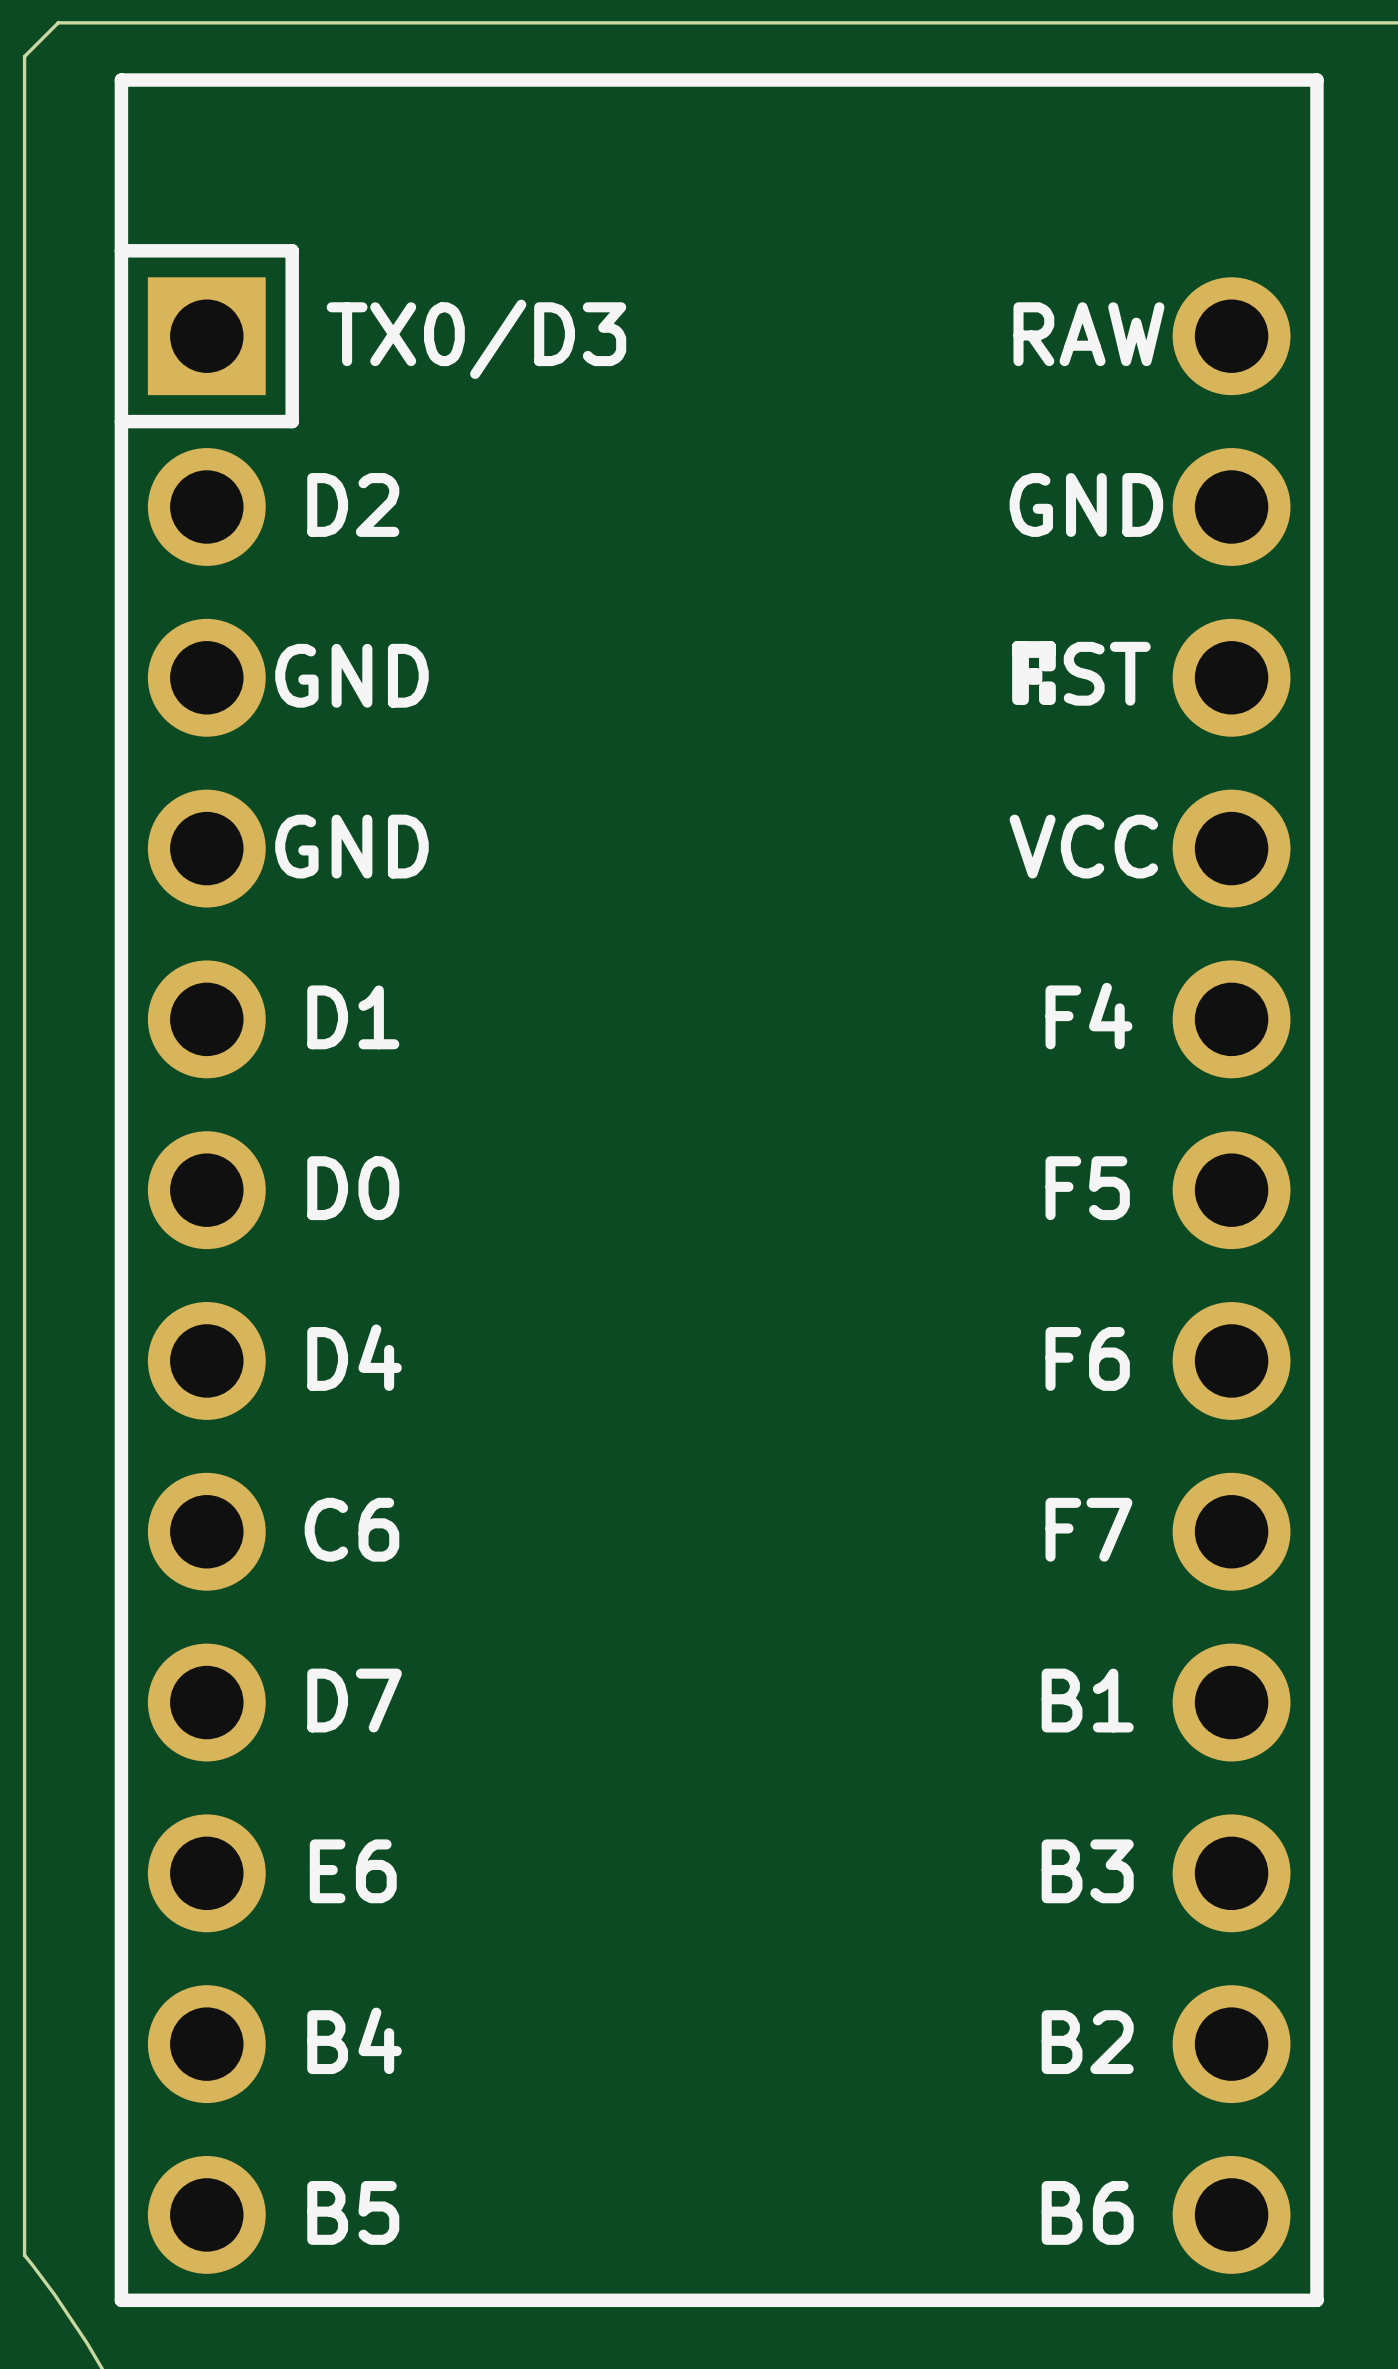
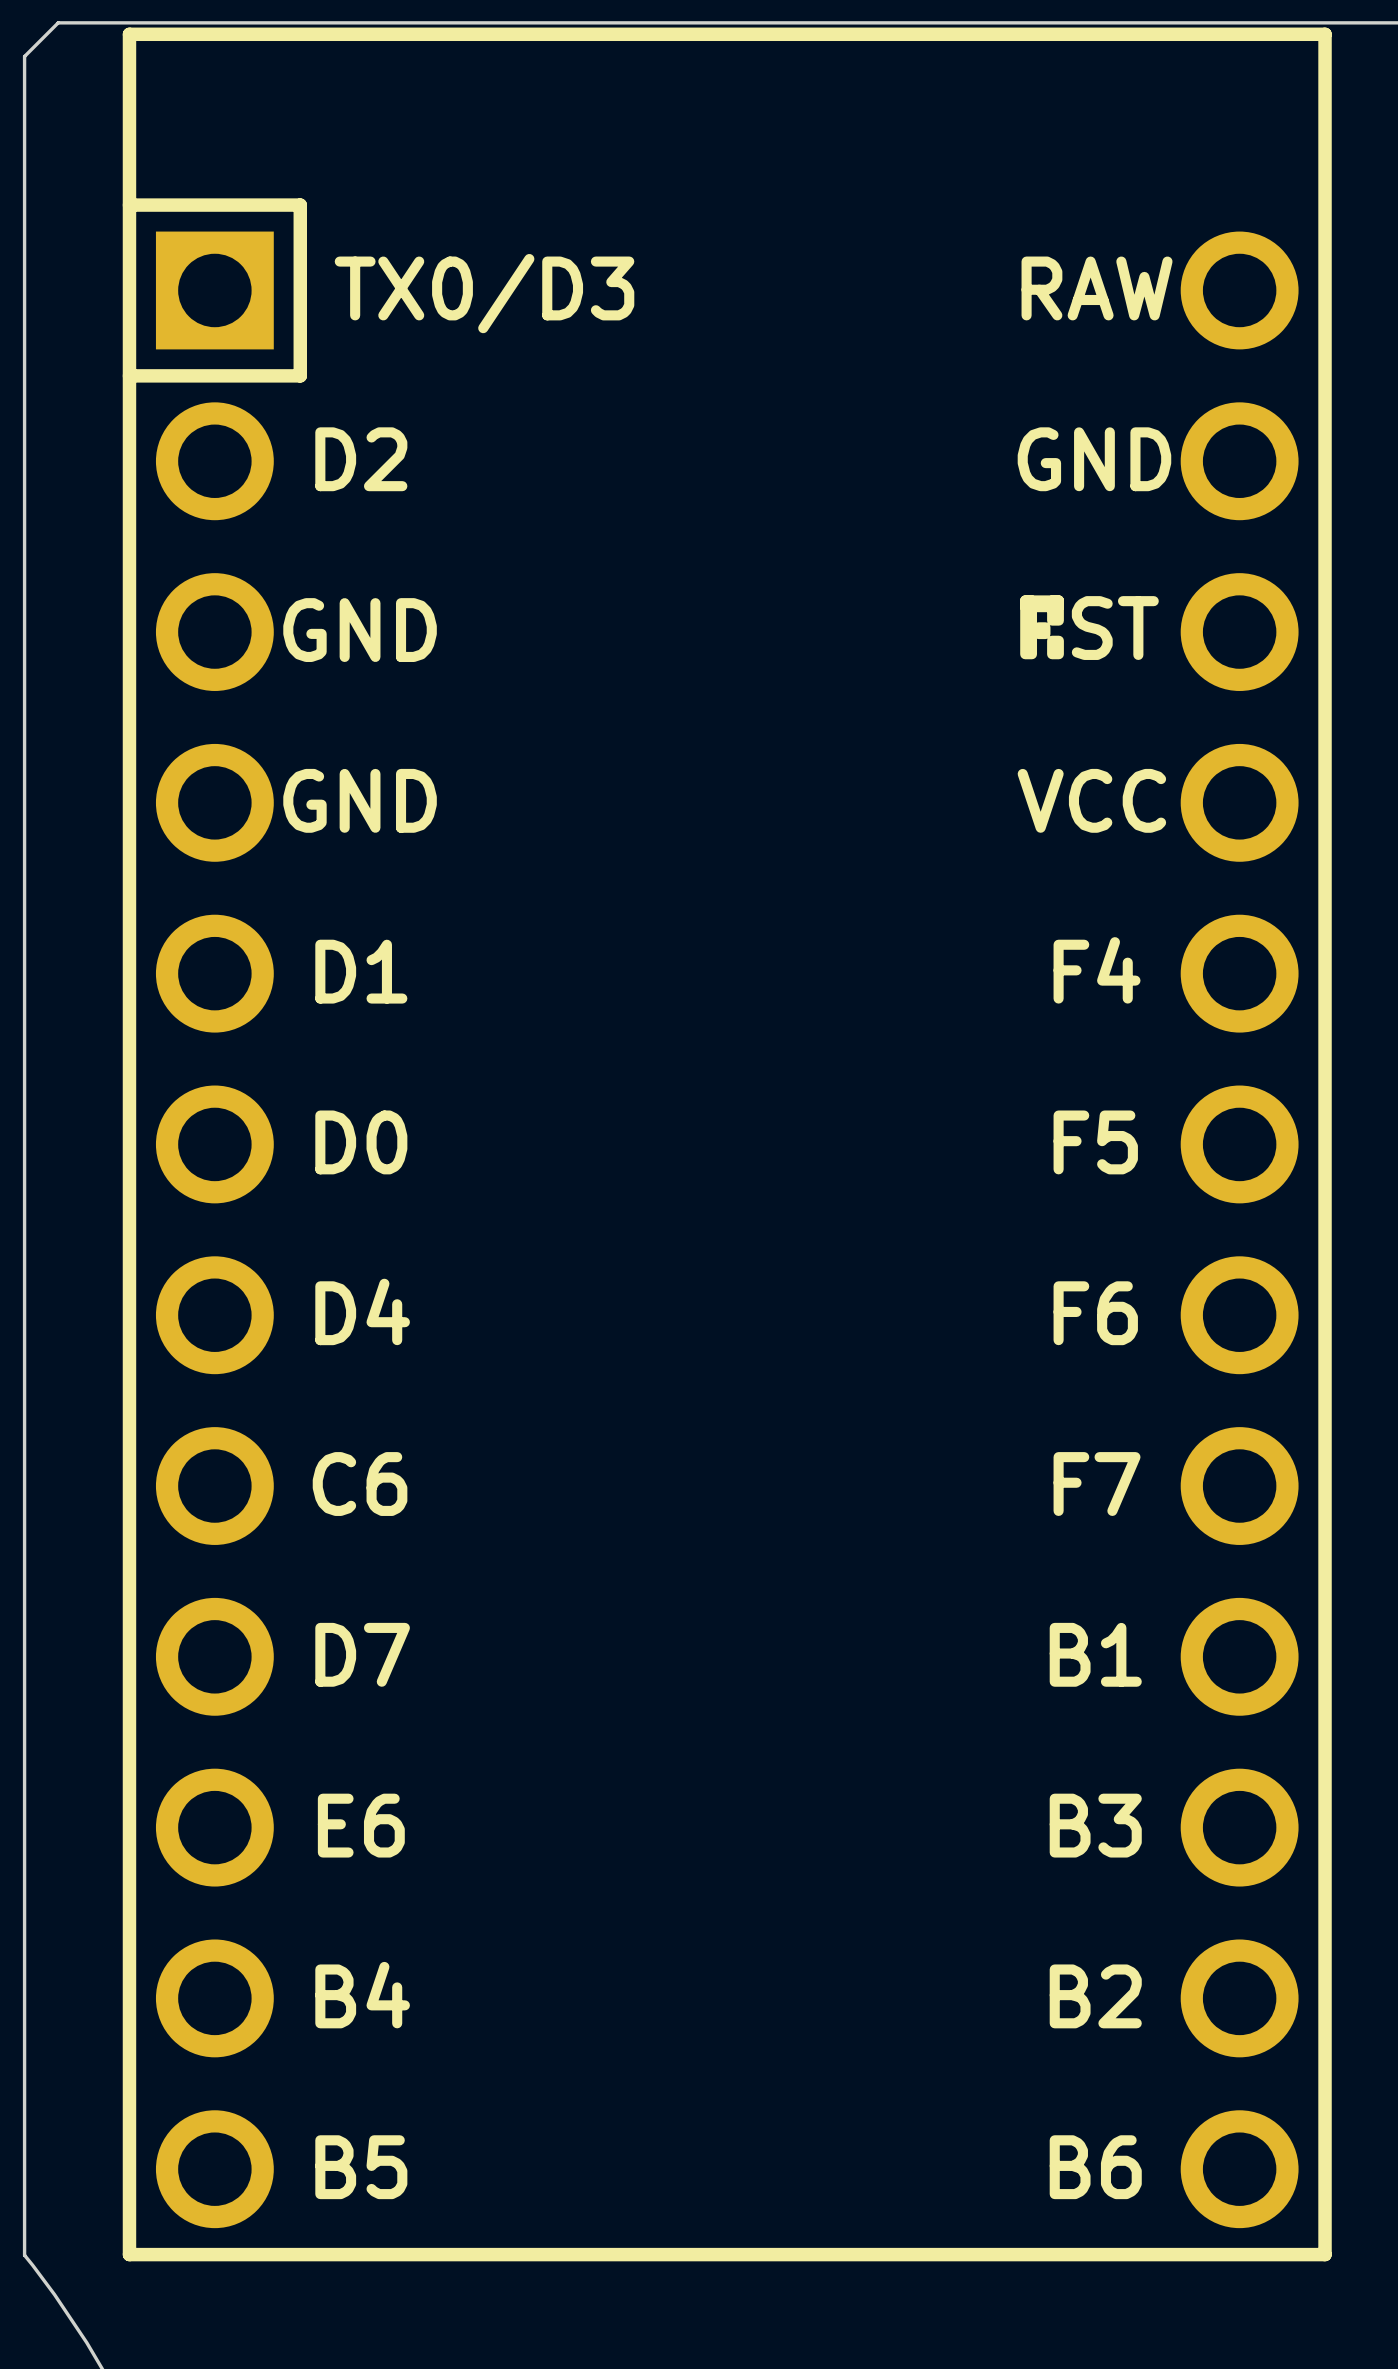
part position: (719, 1190) -> (727, 1144)

